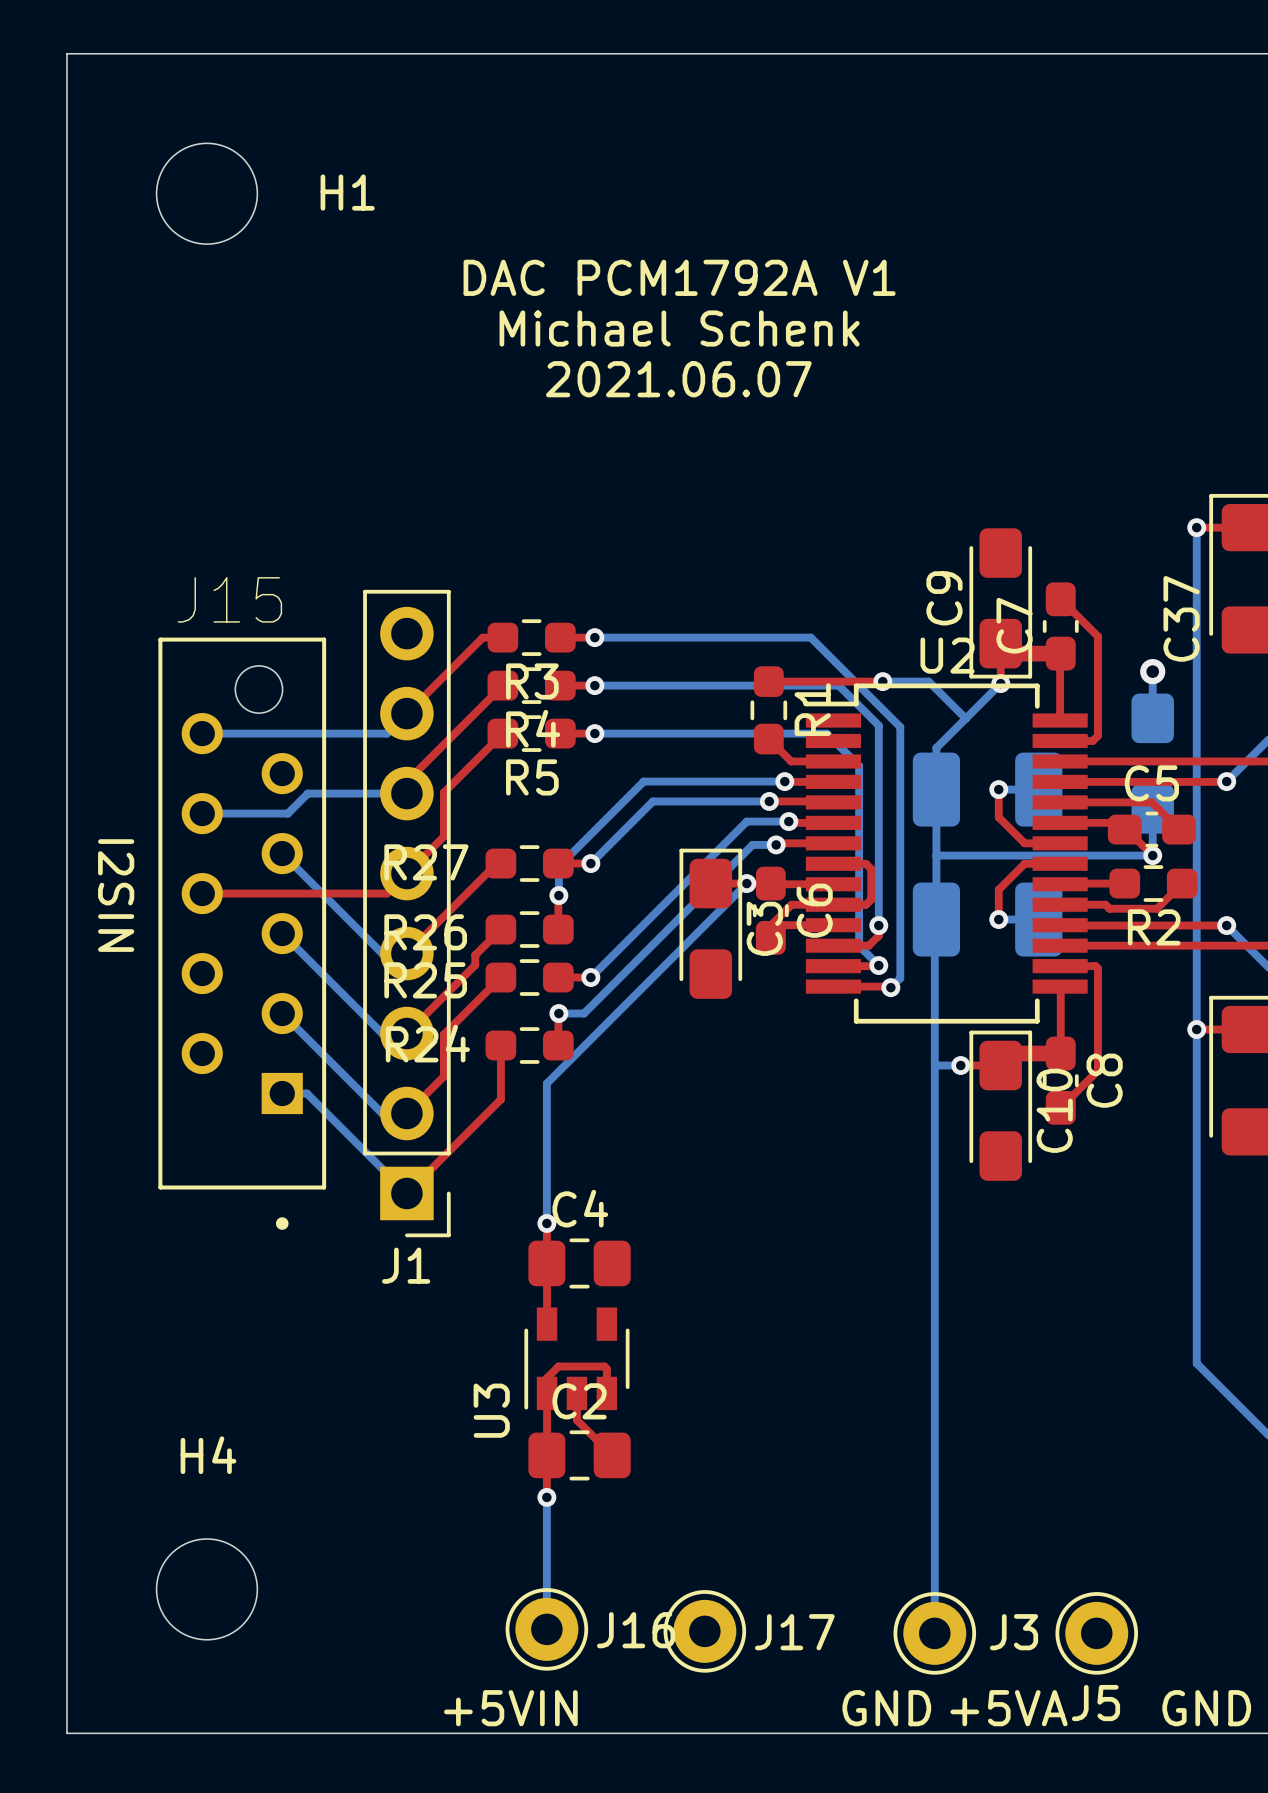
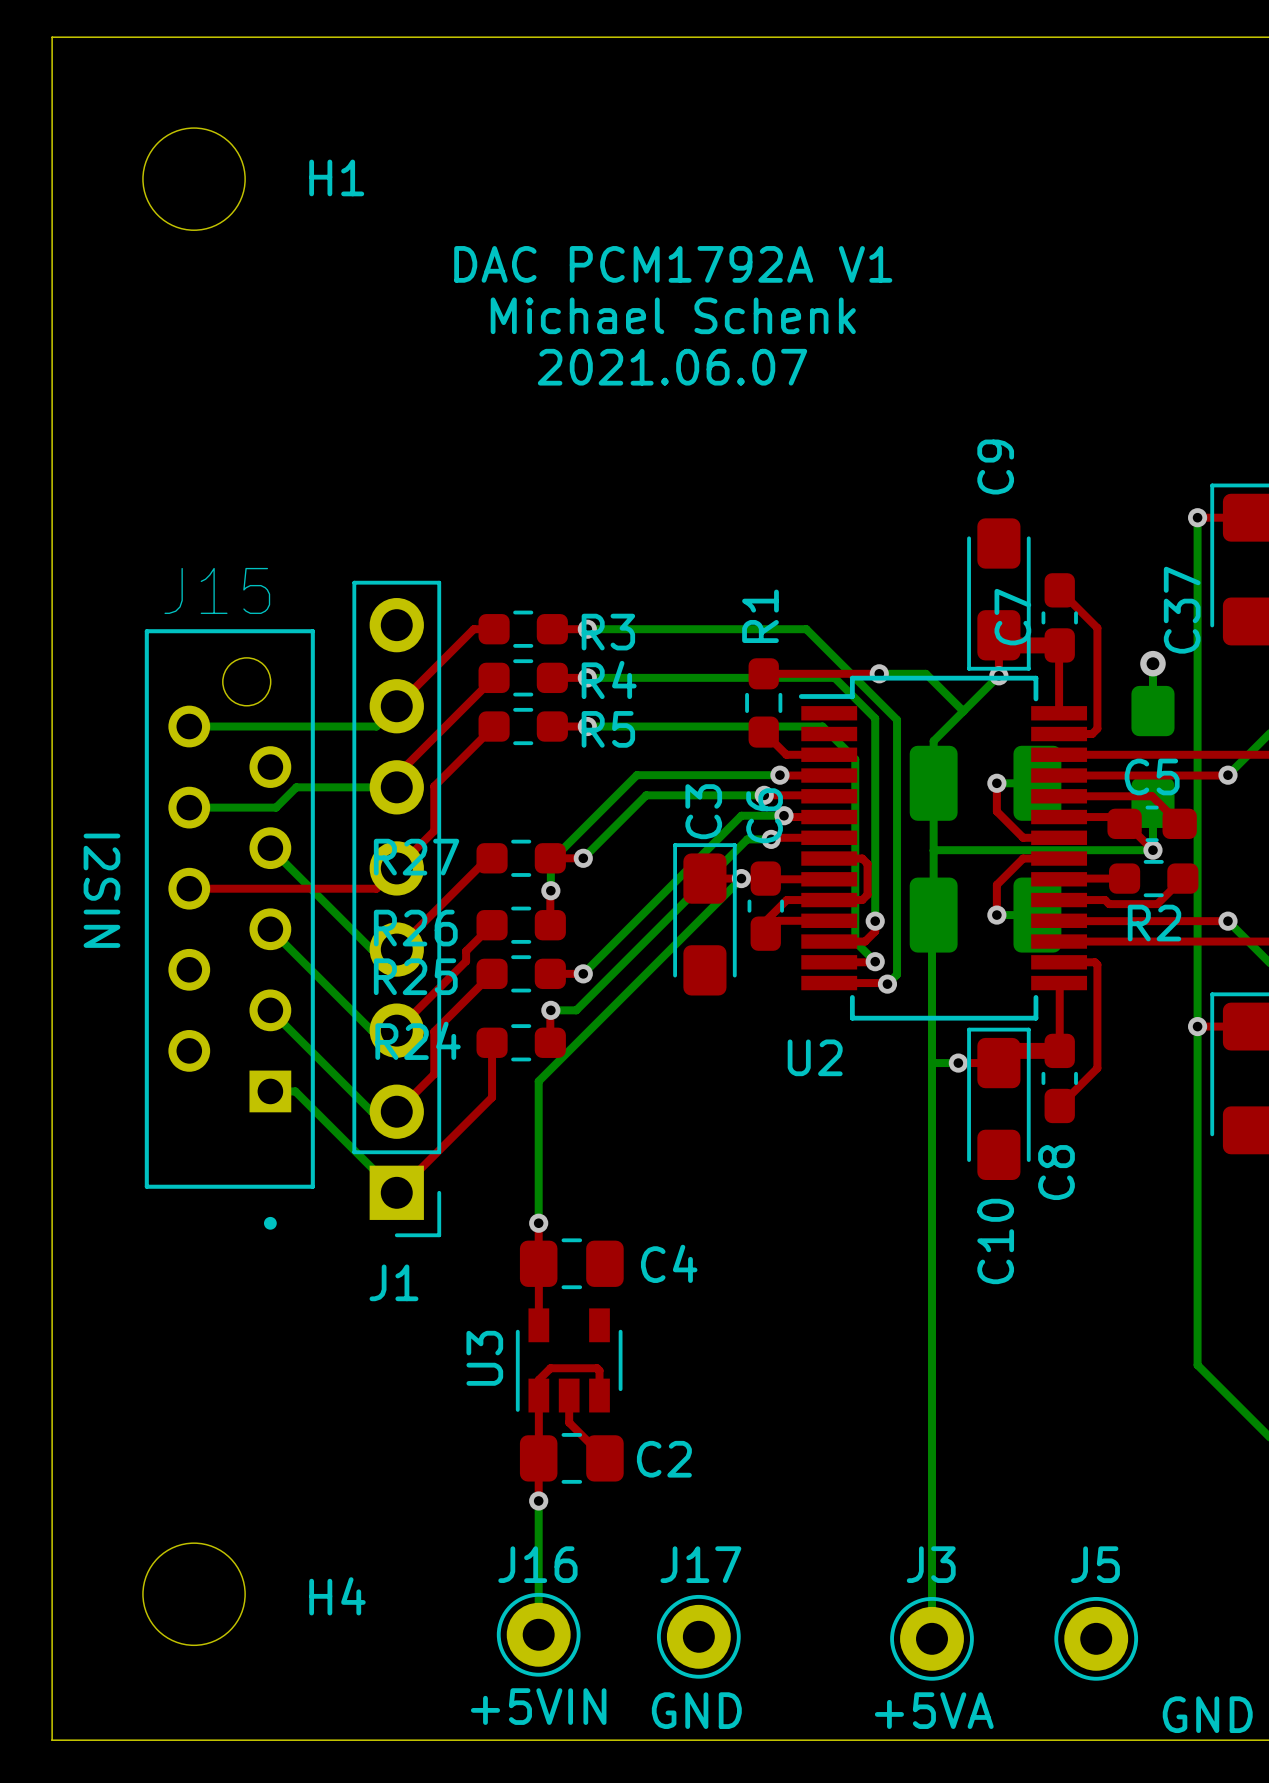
C9 name position: C9 (944, 598) -> C9 (995, 467)
U2 name position: U2 (947, 655) -> U2 (815, 1057)
R3 name position: R3 (532, 681) -> R3 (608, 632)
R1 name position: R1 (812, 709) -> R1 (760, 616)
R4 name position: R4 (533, 728) -> R4 (609, 679)
R5 name position: R5 (532, 777) -> R5 (608, 729)
C6 name position: C6 (814, 910) -> C6 (764, 815)
C3 name position: C3 (764, 928) -> C3 (703, 811)
C8 name position: C8 (1104, 1080) -> C8 (1056, 1172)
C10 name position: C10 (1054, 1110) -> C10 (995, 1241)
C4 name position: C4 (580, 1208) -> C4 (669, 1263)
J1 name position: J1 (406, 1265) -> J1 (393, 1282)
C2 name position: C2 (579, 1401) -> C2 (664, 1459)
U3 name position: U3 (491, 1410) -> U3 (484, 1358)
H4 name position: H4 (208, 1455) -> H4 (337, 1596)
J16 name position: J16 (636, 1630) -> J16 (537, 1564)
J17 name position: J17 (794, 1632) -> J17 (700, 1564)
J3 name position: J3 (1014, 1632) -> J3 (931, 1564)
J5 name position: J5 (1095, 1703) -> J5 (1095, 1564)
text position: +5VIN (510, 1708) -> +5VIN (538, 1706)
text position: GND (886, 1708) -> GND (696, 1710)
text position: +5VA (1009, 1708) -> +5VA (934, 1710)

